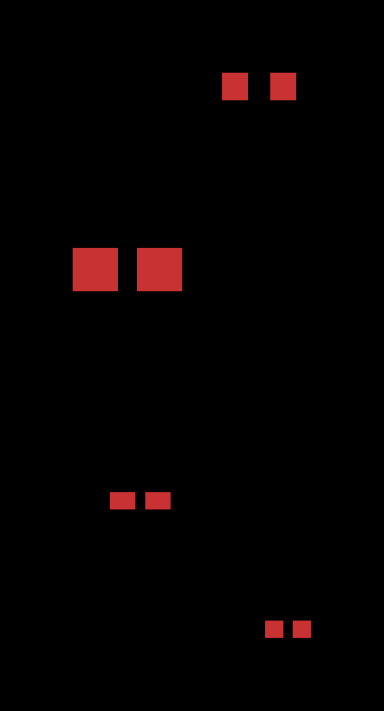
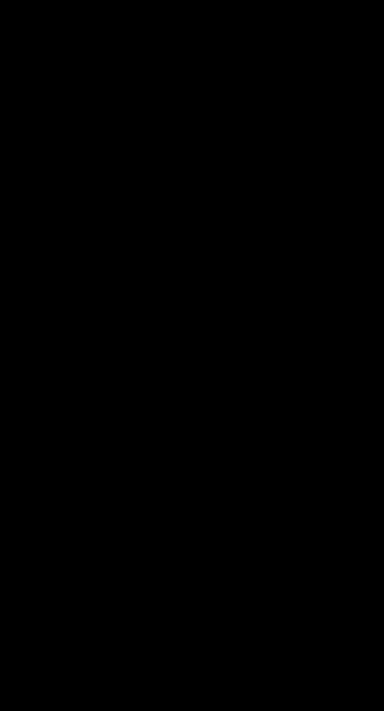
part: (259, 86) -> none
part: (127, 269) -> none
part: (140, 500) -> none
part: (288, 629) -> none

